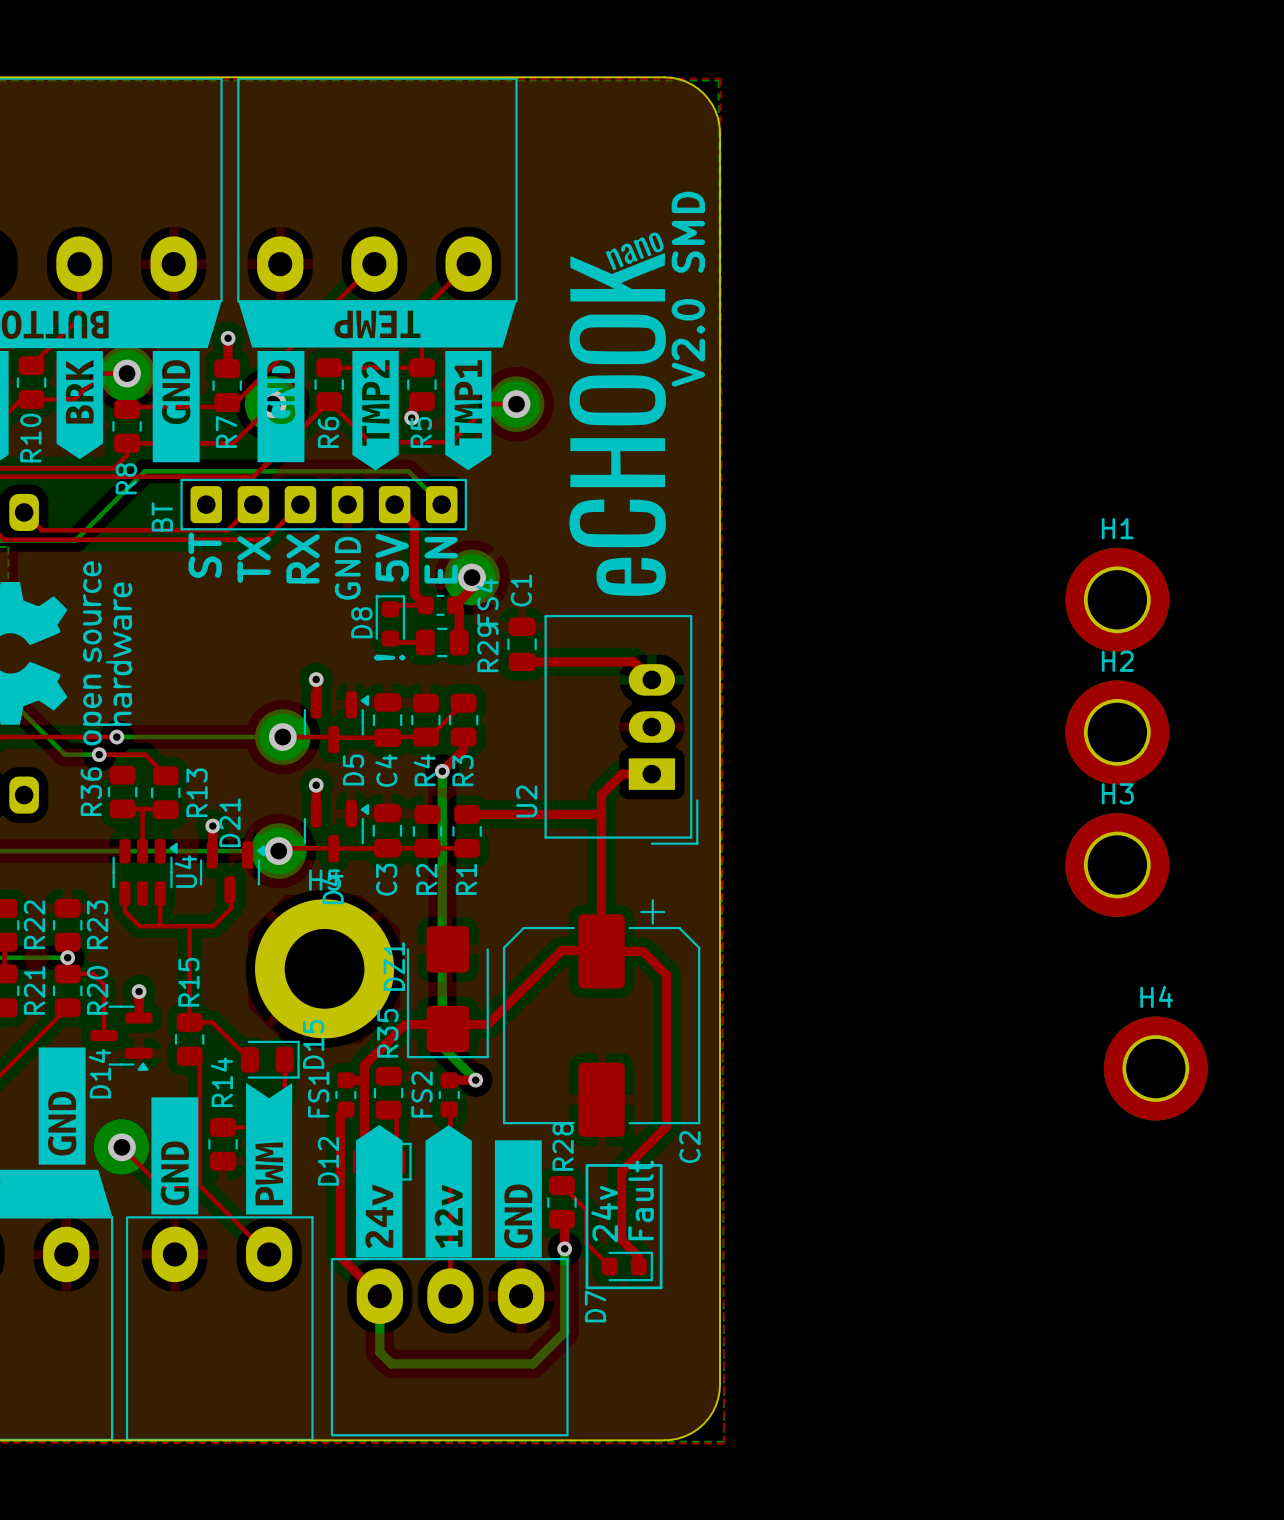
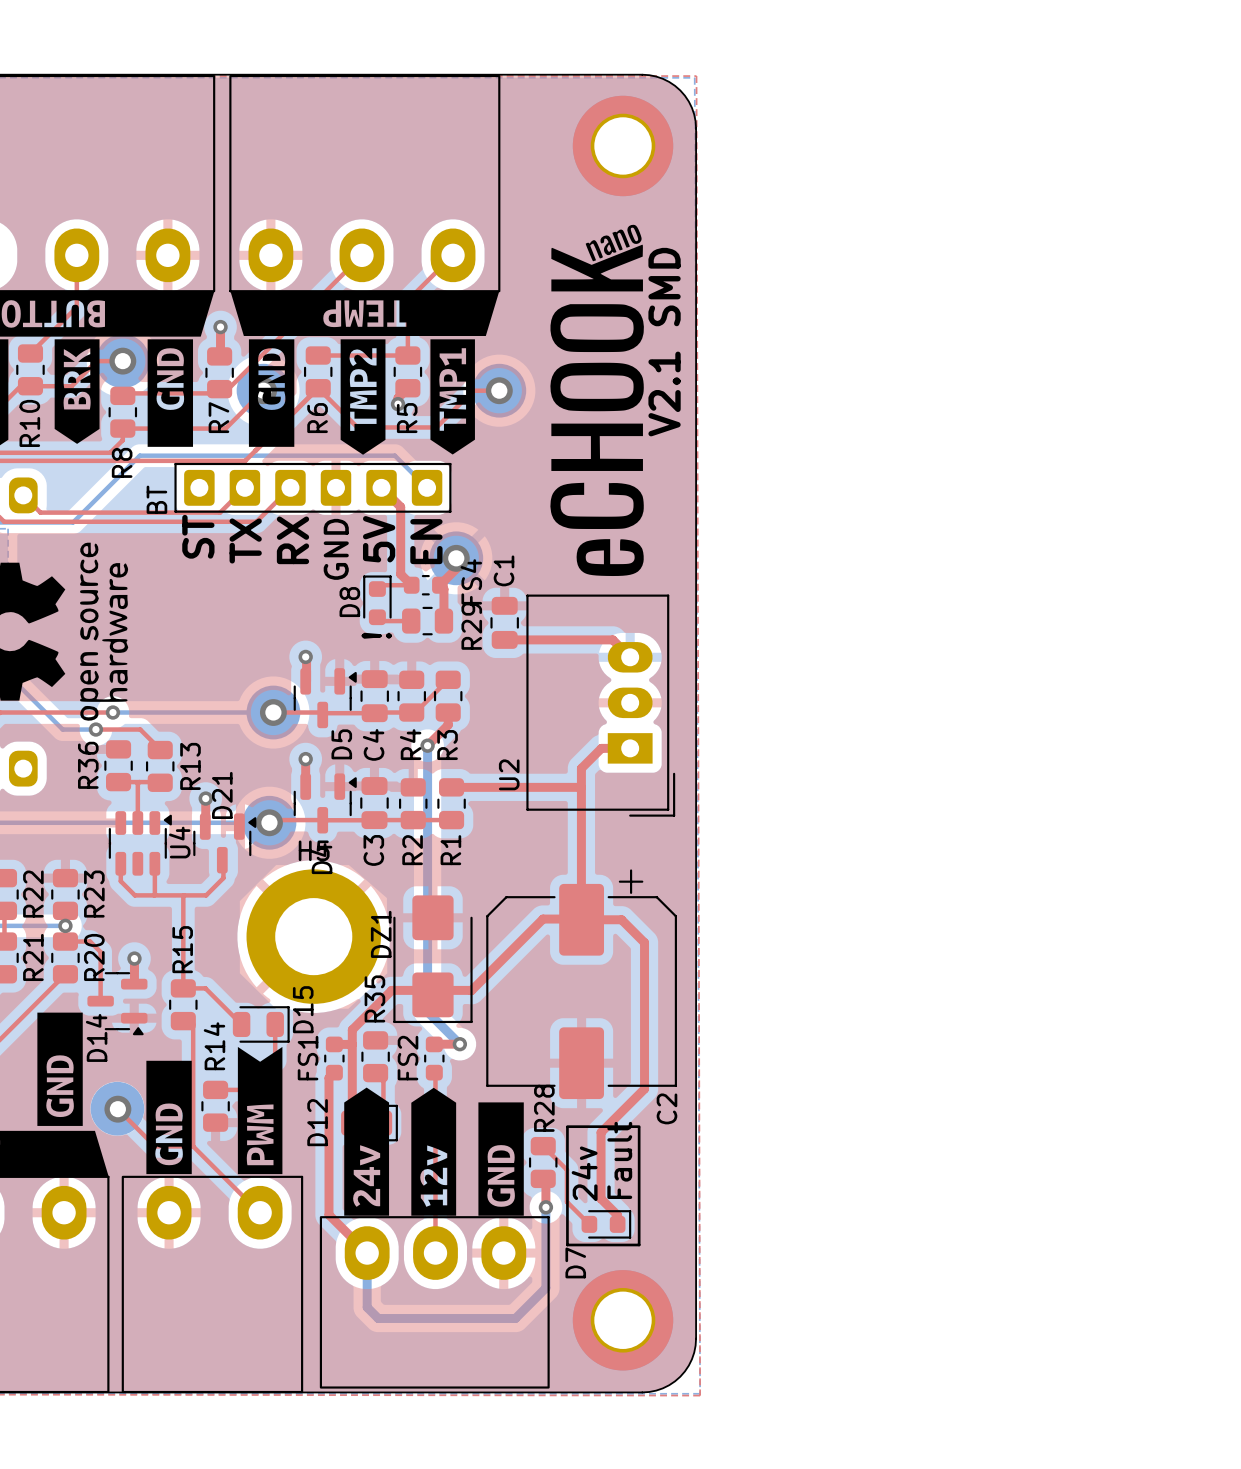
part: none -> (623, 145)
text: V2.0 SMD (688, 289) -> V2.1 SMD (664, 342)
H1: (1117, 599) -> none
H2: (1117, 732) -> none
H3: (1117, 864) -> none
H4: (1155, 1068) -> none
part: none -> (623, 1320)

